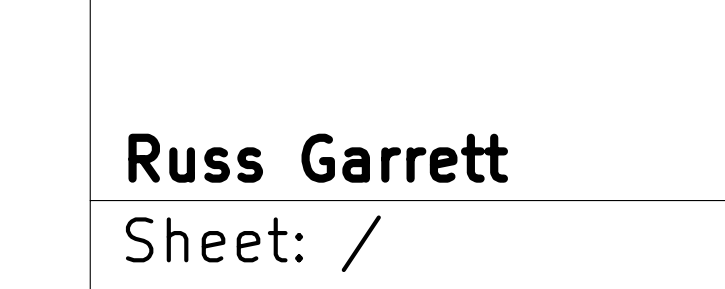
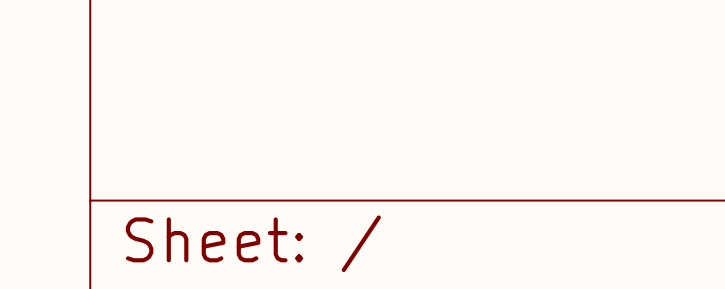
title block: Russ Garrett (318, 158) -> none

